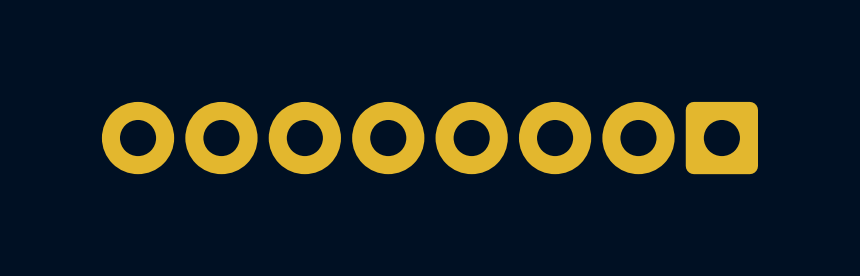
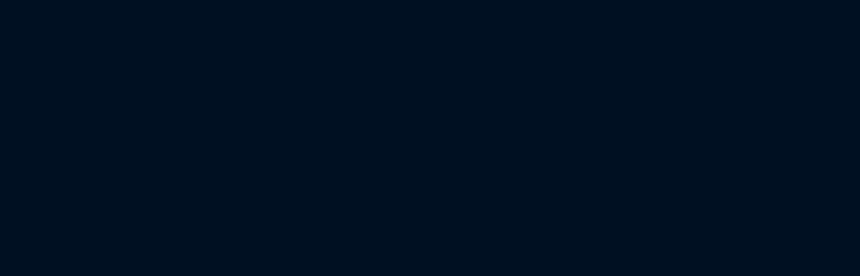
part: (429, 138) -> none

